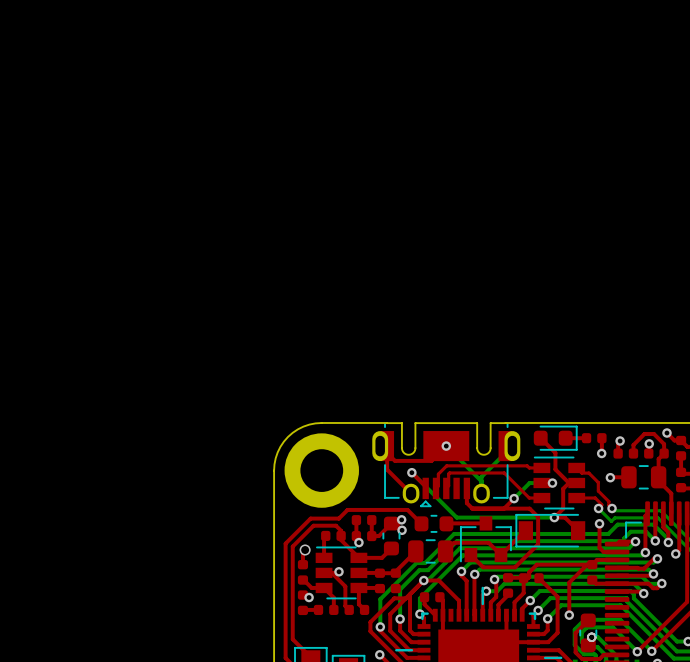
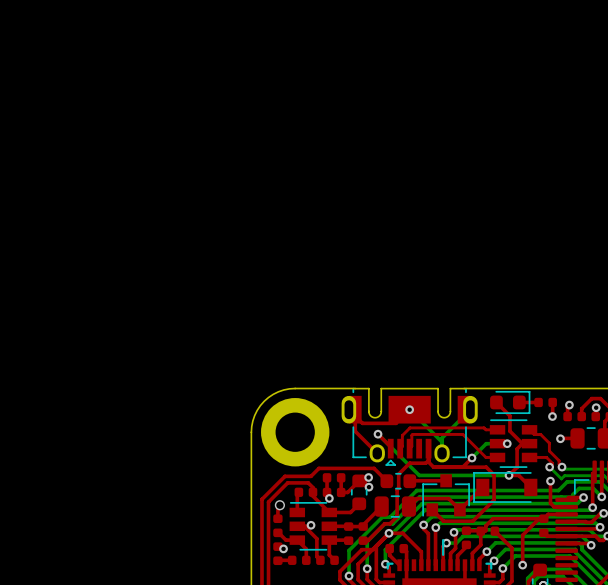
top track: none -> (428, 460) (425, 463) (409, 463) (398, 474) (397, 516) (389, 523) (384, 523) (367, 540) (363, 540)

